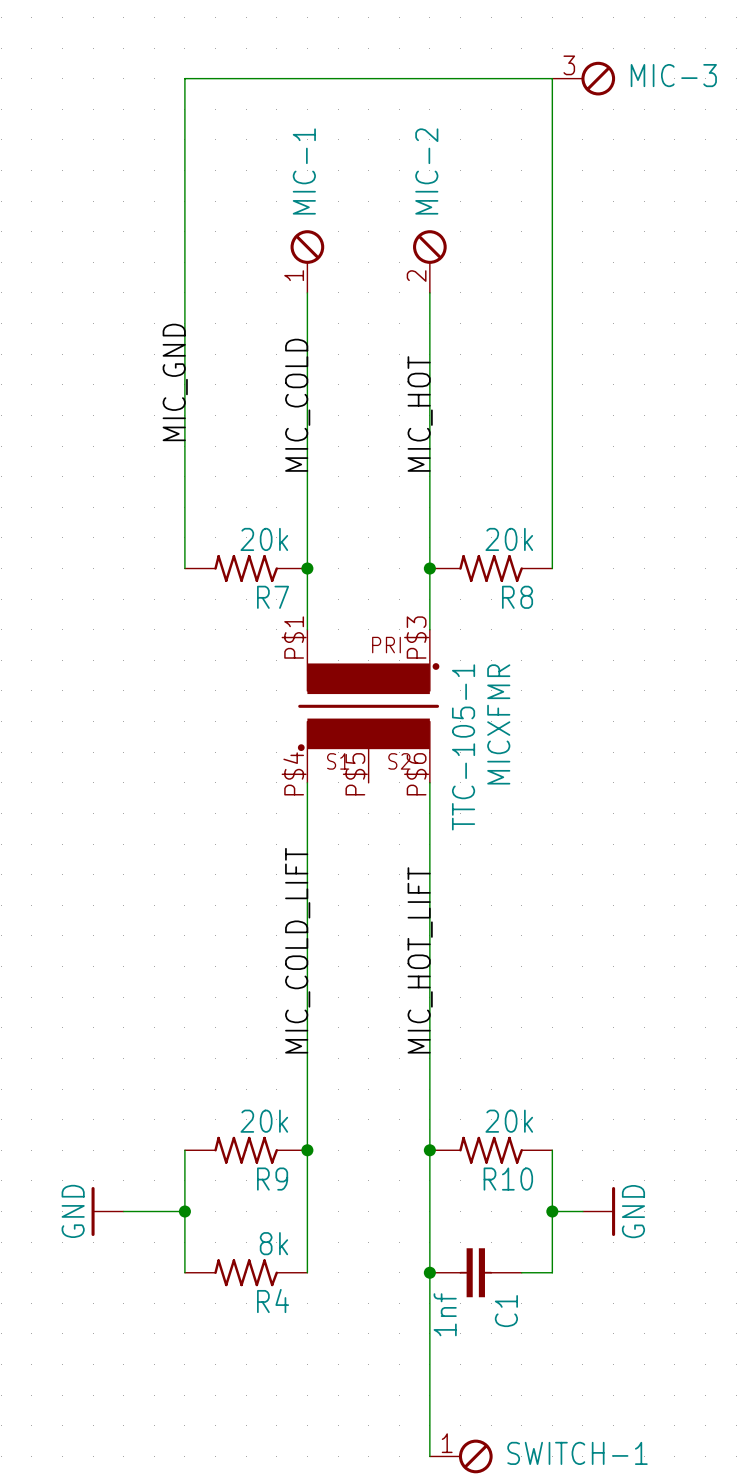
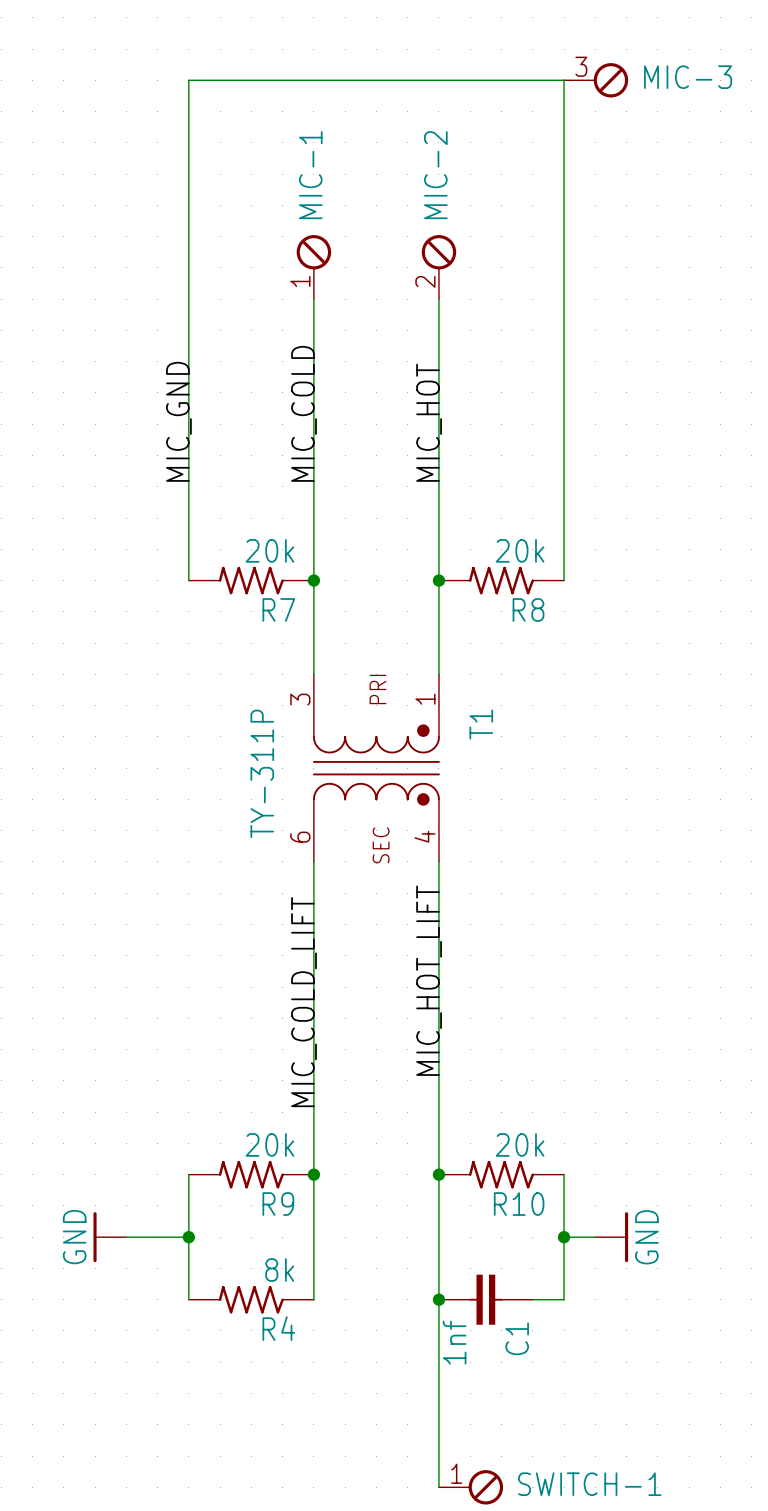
label position: MIC_GND (175, 382) -> MIC_GND (178, 421)
MICXFMR: TTC-105-1 (368, 706) -> none
T1: none -> TY-311P (376, 768)
label position: MIC_COLD_LIFT (297, 950) -> MIC_COLD_LIFT (304, 1002)

